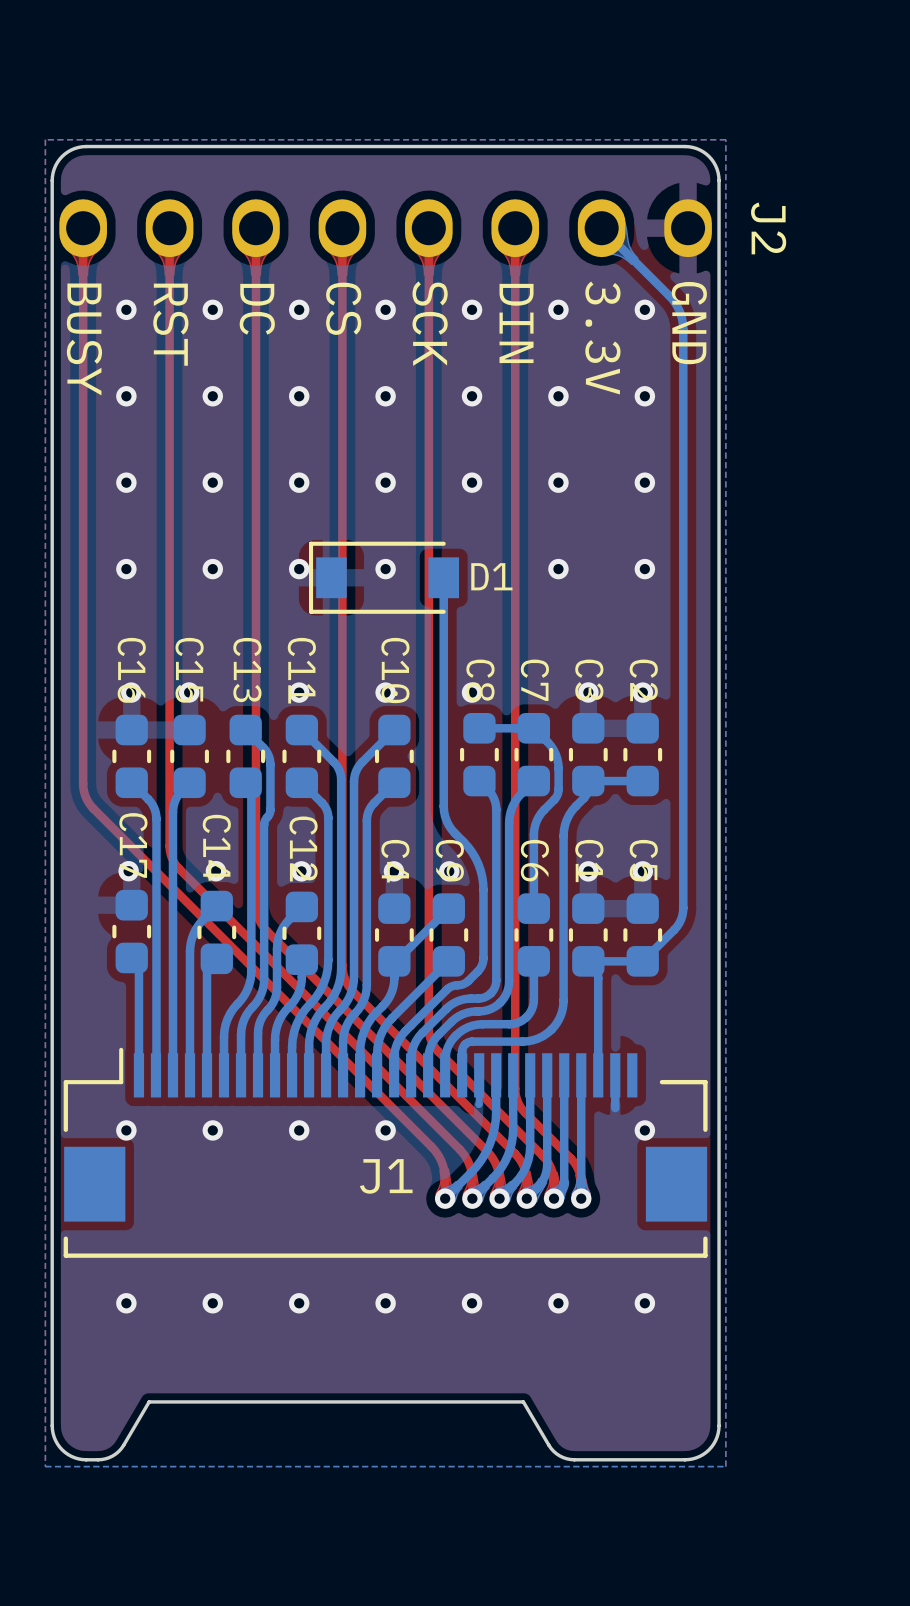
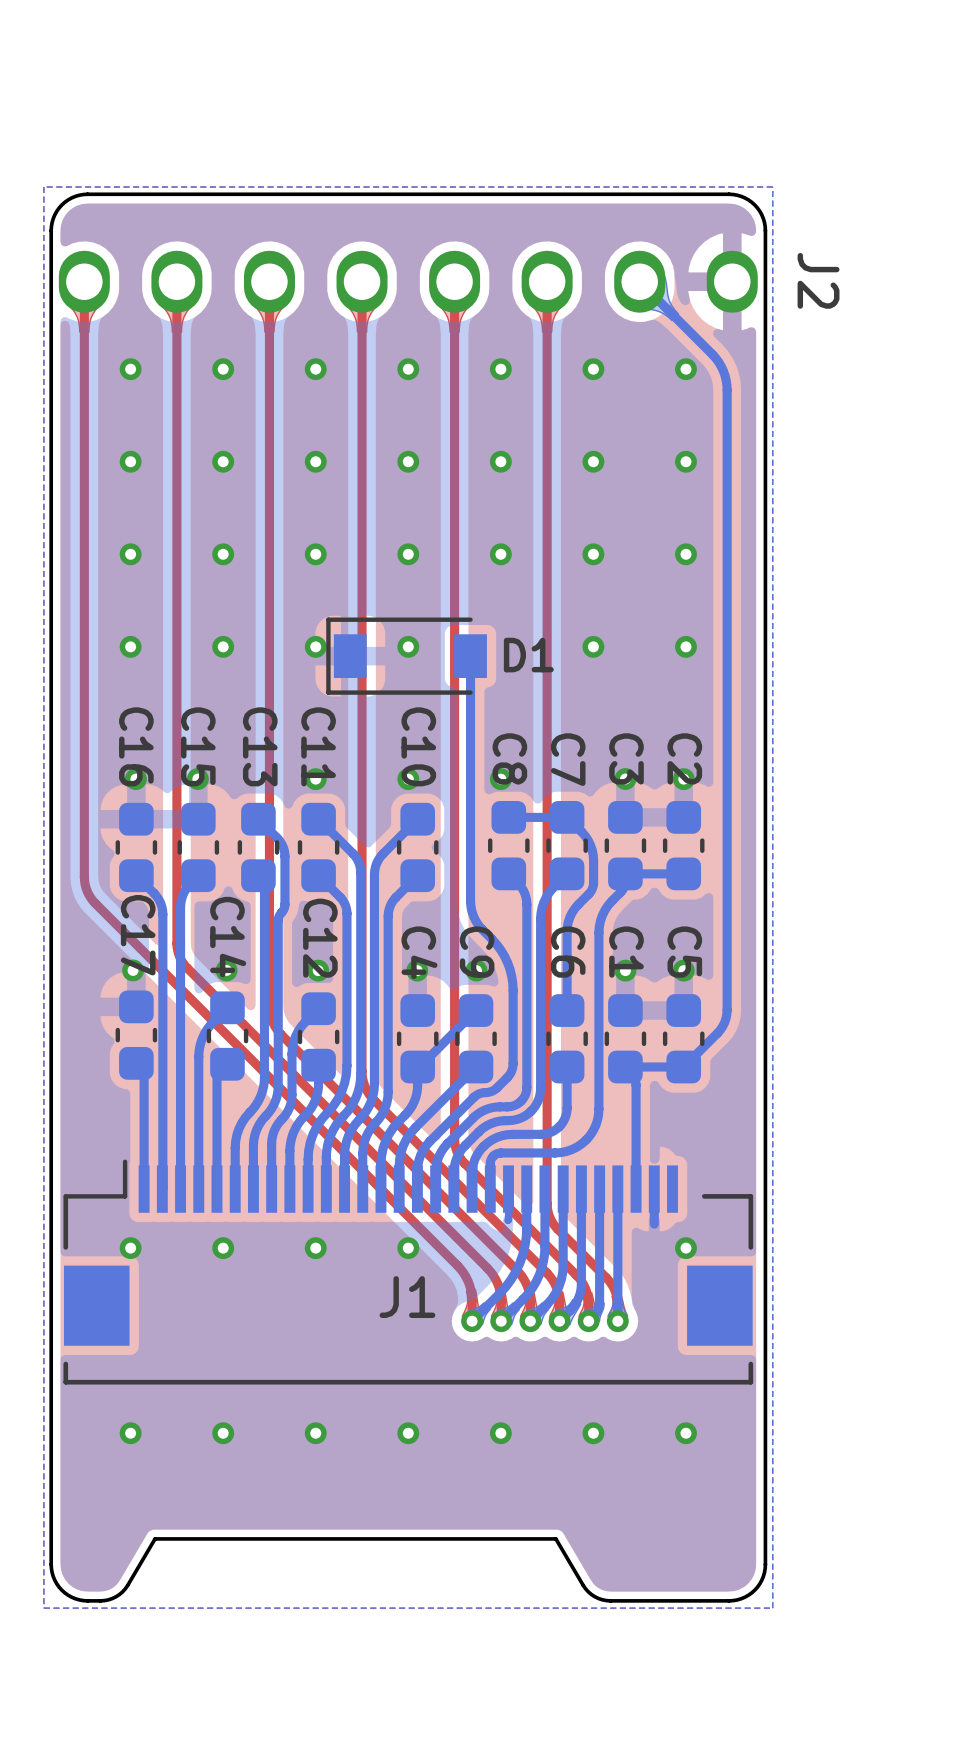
text: CS (343, 308) -> none
text: DC (257, 309) -> none
text: SCK (430, 323) -> none
text: DIN (516, 323) -> none
text: GND (689, 323) -> none
text: RST (170, 324) -> none
text: 3.3V (602, 338) -> none
text: BUSY (84, 339) -> none

